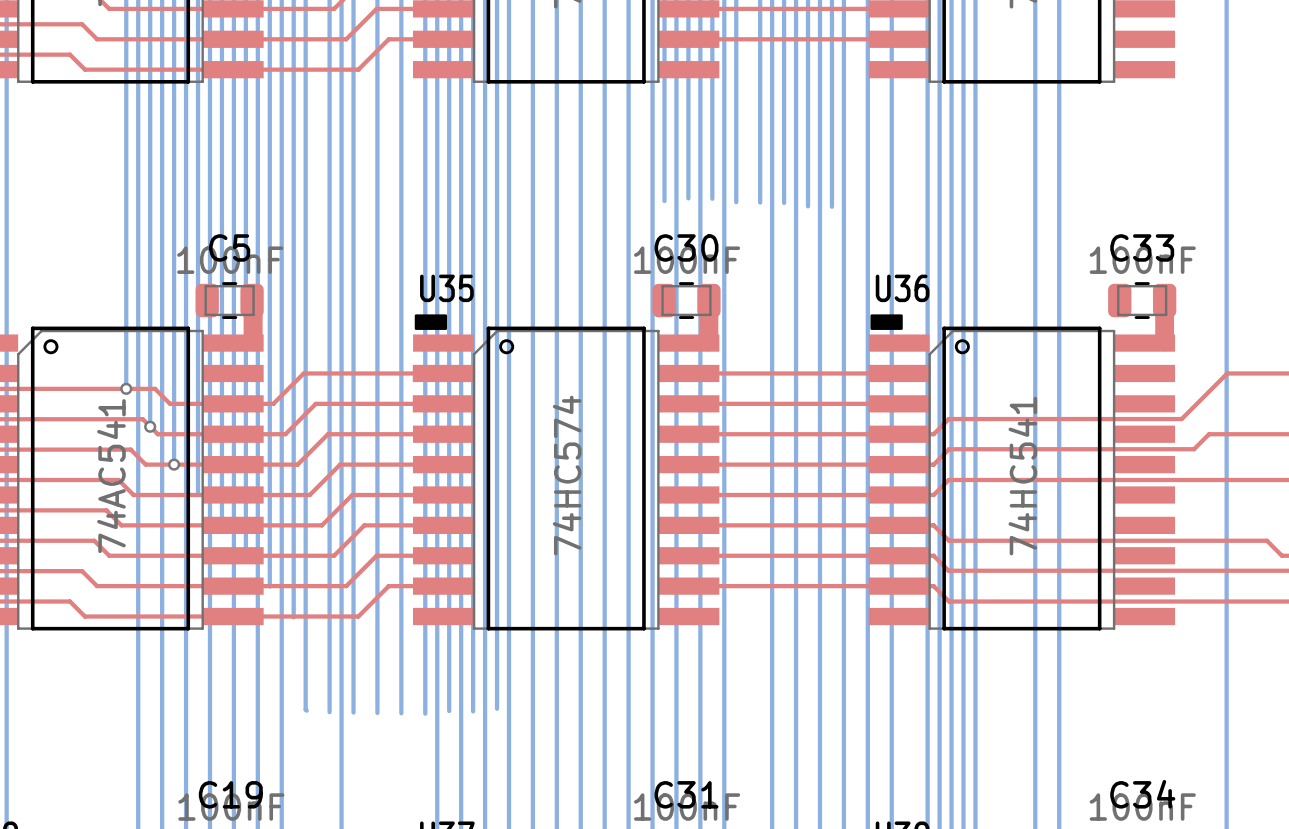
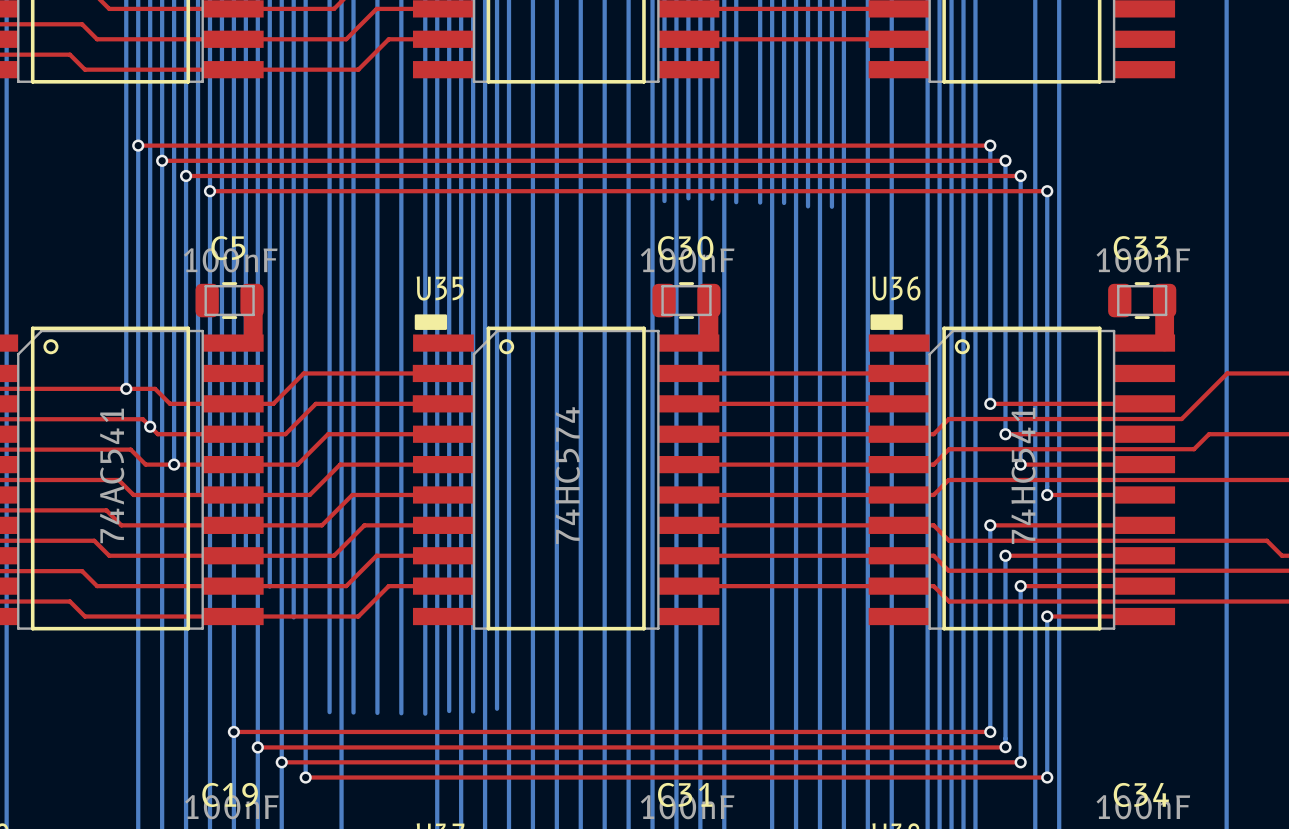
top track: none -> (138, 145) (990, 145)
via: none -> (138, 145)
bottom track: none -> (990, 145) (990, 403)
via: none -> (990, 145)
top track: none -> (162, 160) (1005, 160)
via: none -> (162, 160)
bottom track: none -> (1005, 160) (1005, 434)
via: none -> (1005, 160)
top track: none -> (186, 175) (1020, 175)
via: none -> (186, 175)
bottom track: none -> (1020, 175) (1020, 464)
via: none -> (1020, 175)
top track: none -> (209, 191) (1047, 191)
via: none -> (209, 191)
bottom track: none -> (1047, 191) (1047, 494)
via: none -> (1047, 191)
top track: none -> (990, 403) (1144, 403)
via: none -> (990, 403)
top track: none -> (1005, 434) (1145, 434)
via: none -> (1005, 434)
top track: none -> (1020, 464) (1145, 464)
via: none -> (1020, 464)
top track: none -> (1047, 494) (1145, 494)
via: none -> (1047, 494)
top track: none -> (990, 525) (1144, 525)
bottom track: none -> (990, 525) (990, 731)
via: none -> (990, 525)
top track: none -> (1005, 555) (1144, 555)
bottom track: none -> (1005, 555) (1005, 747)
via: none -> (1005, 555)
top track: none -> (1020, 586) (1144, 586)
bottom track: none -> (1020, 586) (1020, 762)
via: none -> (1020, 586)
top track: none -> (1047, 616) (1144, 616)
bottom track: none -> (1047, 616) (1047, 777)
via: none -> (1047, 616)
bottom track: (305, 709) (306, 710) -> (305, 709) (305, 777)
top track: none -> (233, 731) (990, 731)
via: none -> (233, 731)
via: none -> (990, 731)
top track: none -> (257, 747) (1005, 747)
via: none -> (257, 747)
via: none -> (1005, 747)
top track: none -> (281, 762) (1020, 762)
via: none -> (281, 762)
via: none -> (1020, 762)
top track: none -> (305, 777) (1047, 777)
via: none -> (305, 777)
via: none -> (1047, 777)

